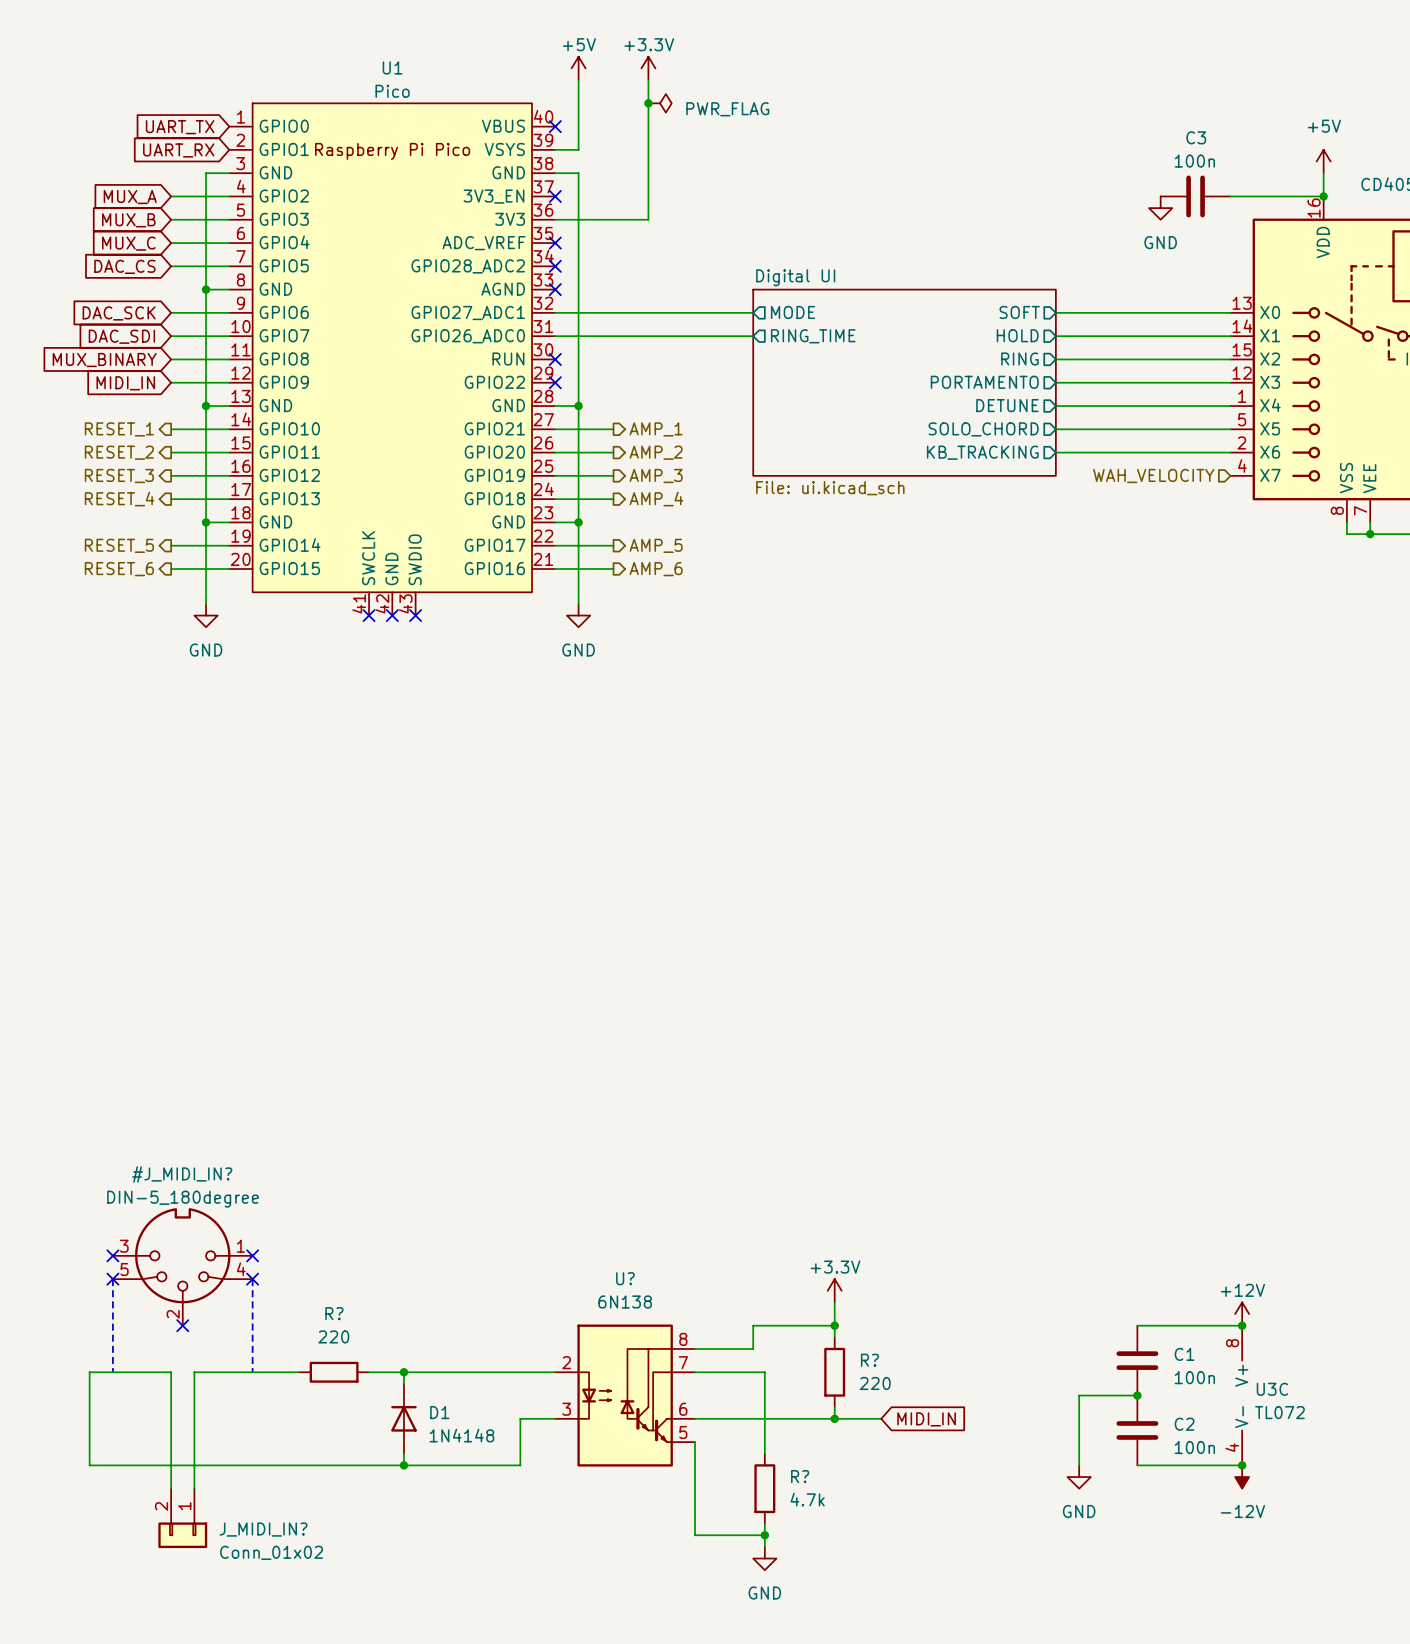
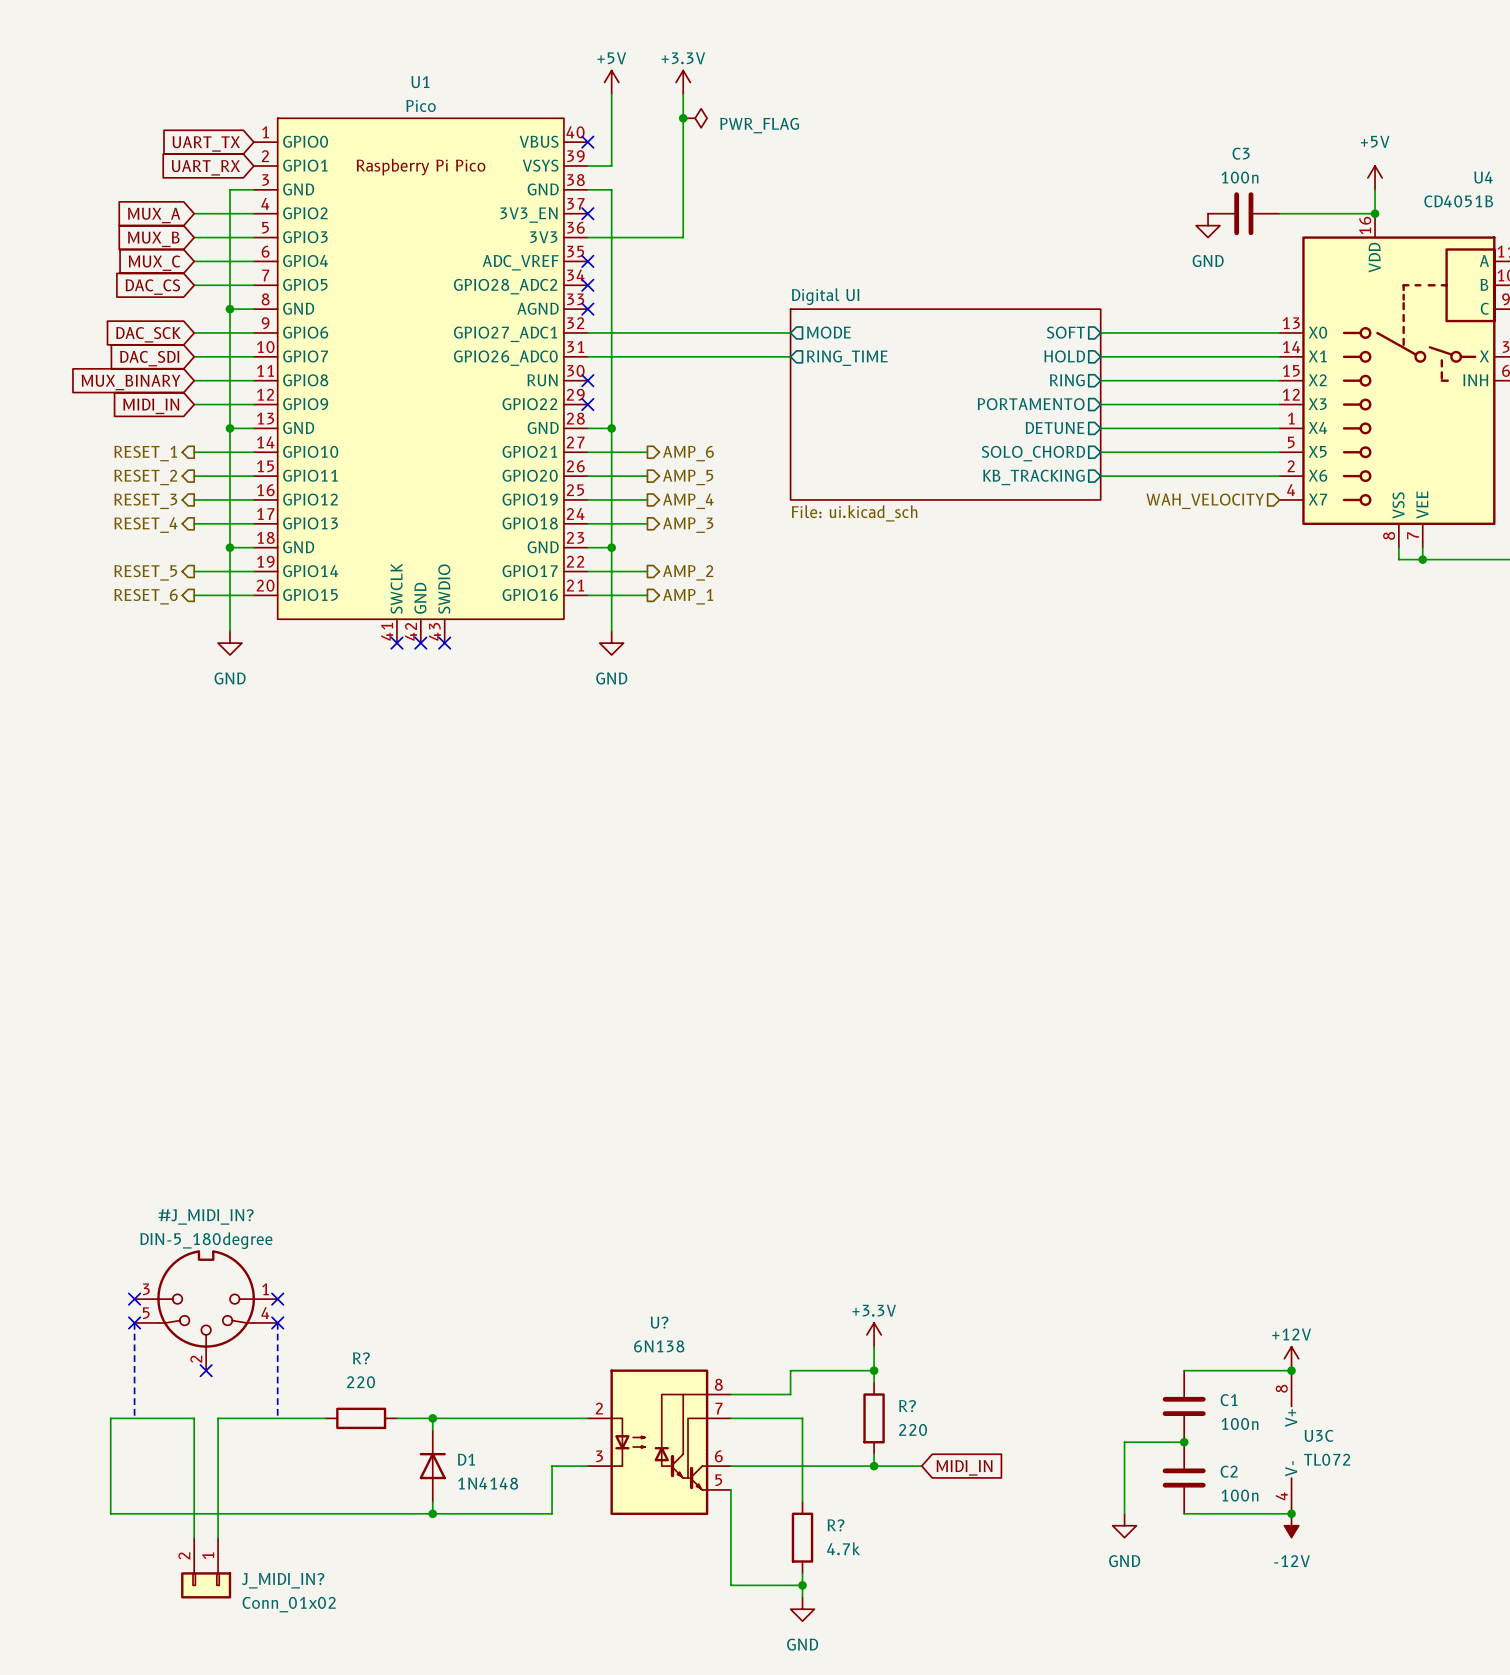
hierarchical label: AMP_1 (656, 429) -> AMP_6 (688, 453)
hierarchical label: AMP_2 (656, 452) -> AMP_5 (688, 477)
hierarchical label: AMP_3 (656, 475) -> AMP_4 (688, 501)
hierarchical label: AMP_4 (656, 498) -> AMP_3 (688, 525)
hierarchical label: AMP_5 (656, 545) -> AMP_2 (688, 572)
hierarchical label: AMP_6 (656, 569) -> AMP_1 (688, 596)

